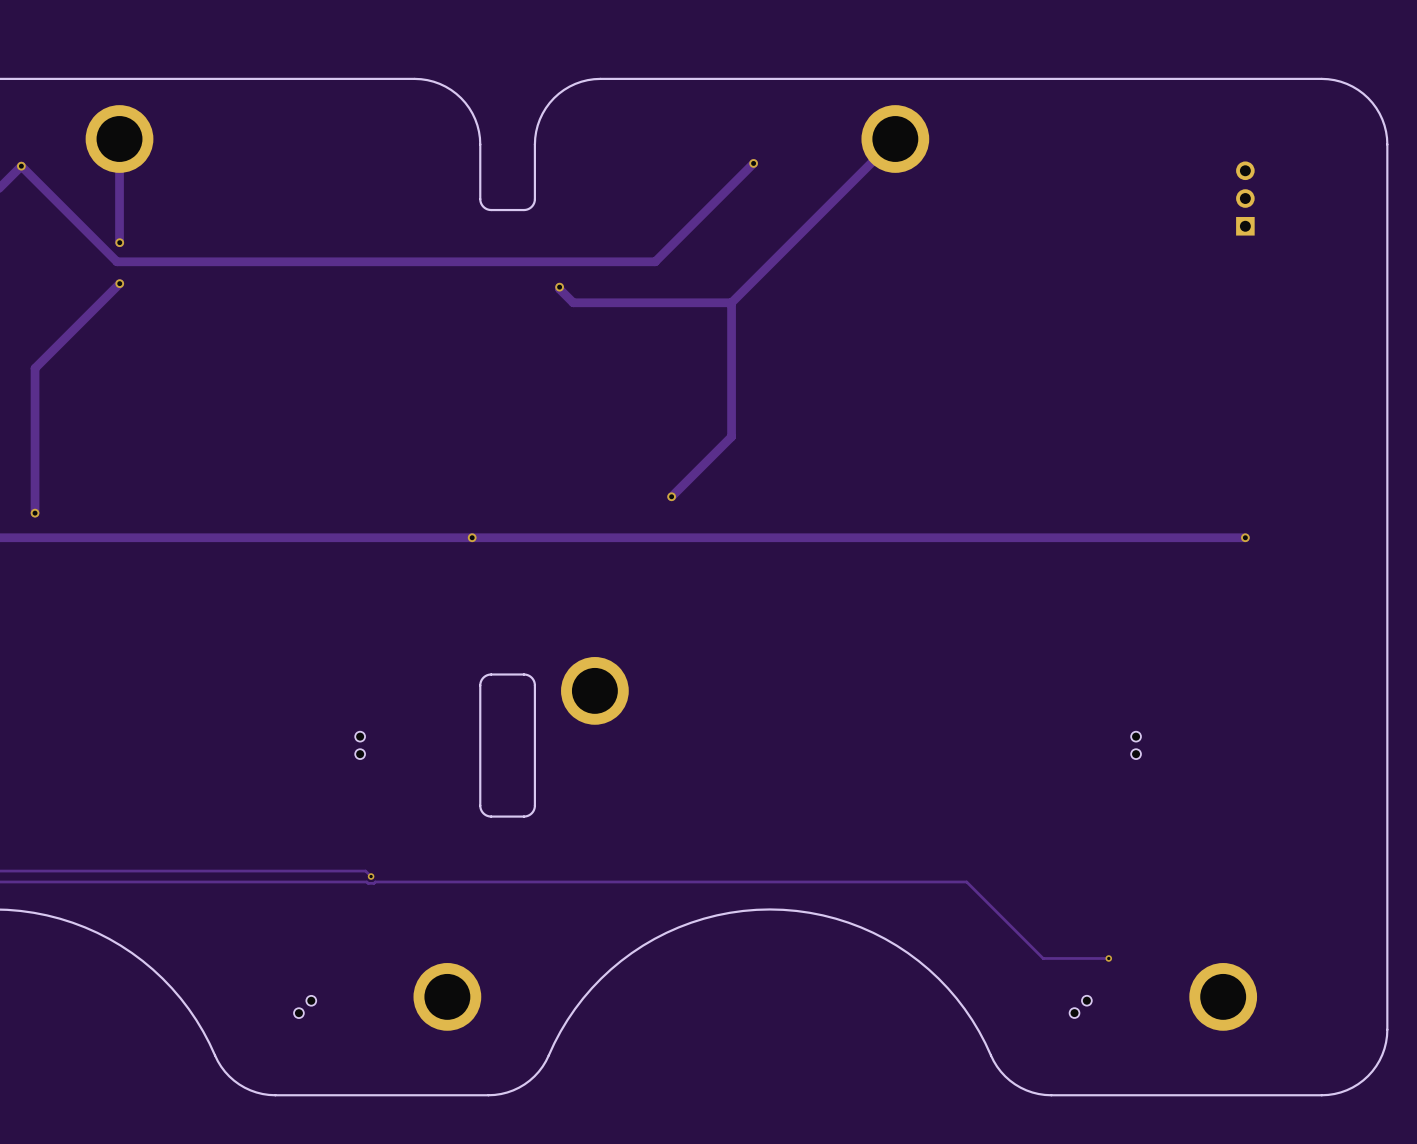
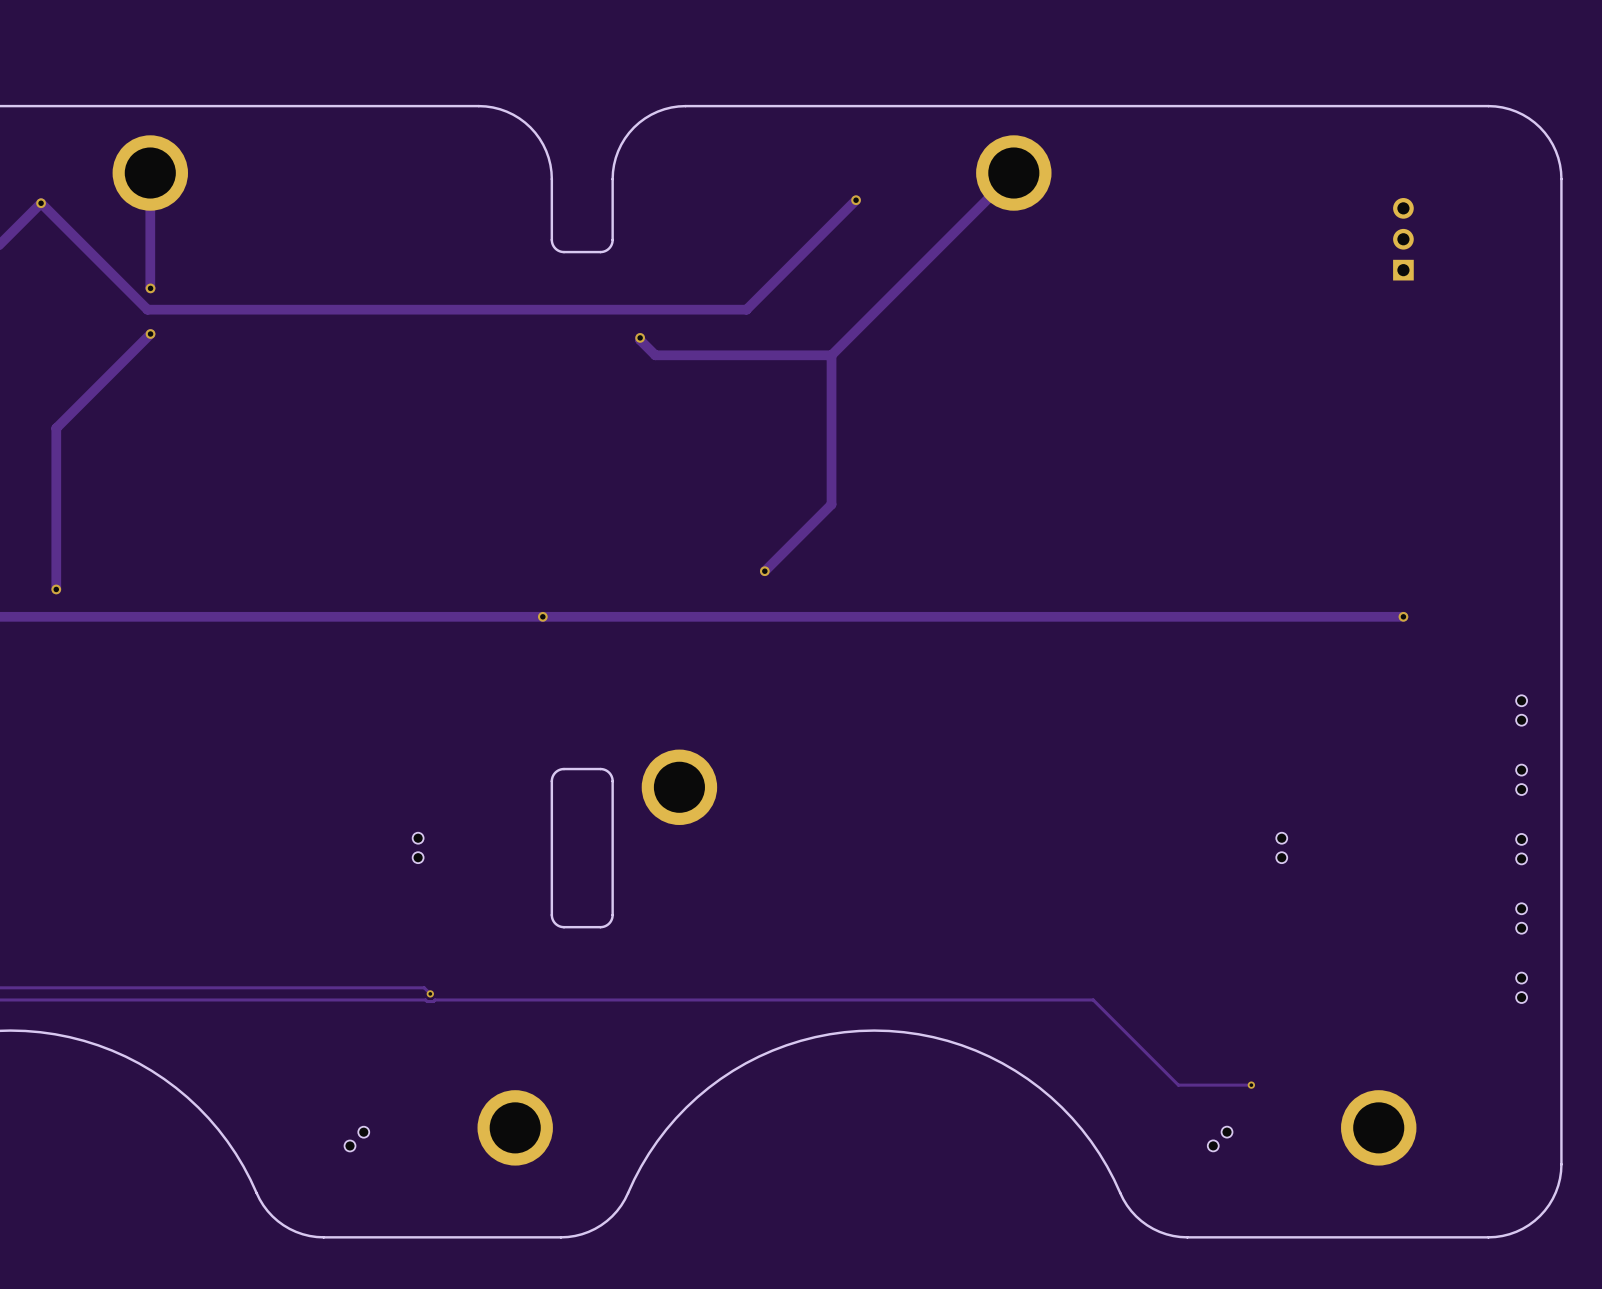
part: none -> (1521, 710)
part: none -> (1521, 779)
part: none -> (1521, 849)
part: none -> (1521, 918)
part: none -> (1521, 987)

